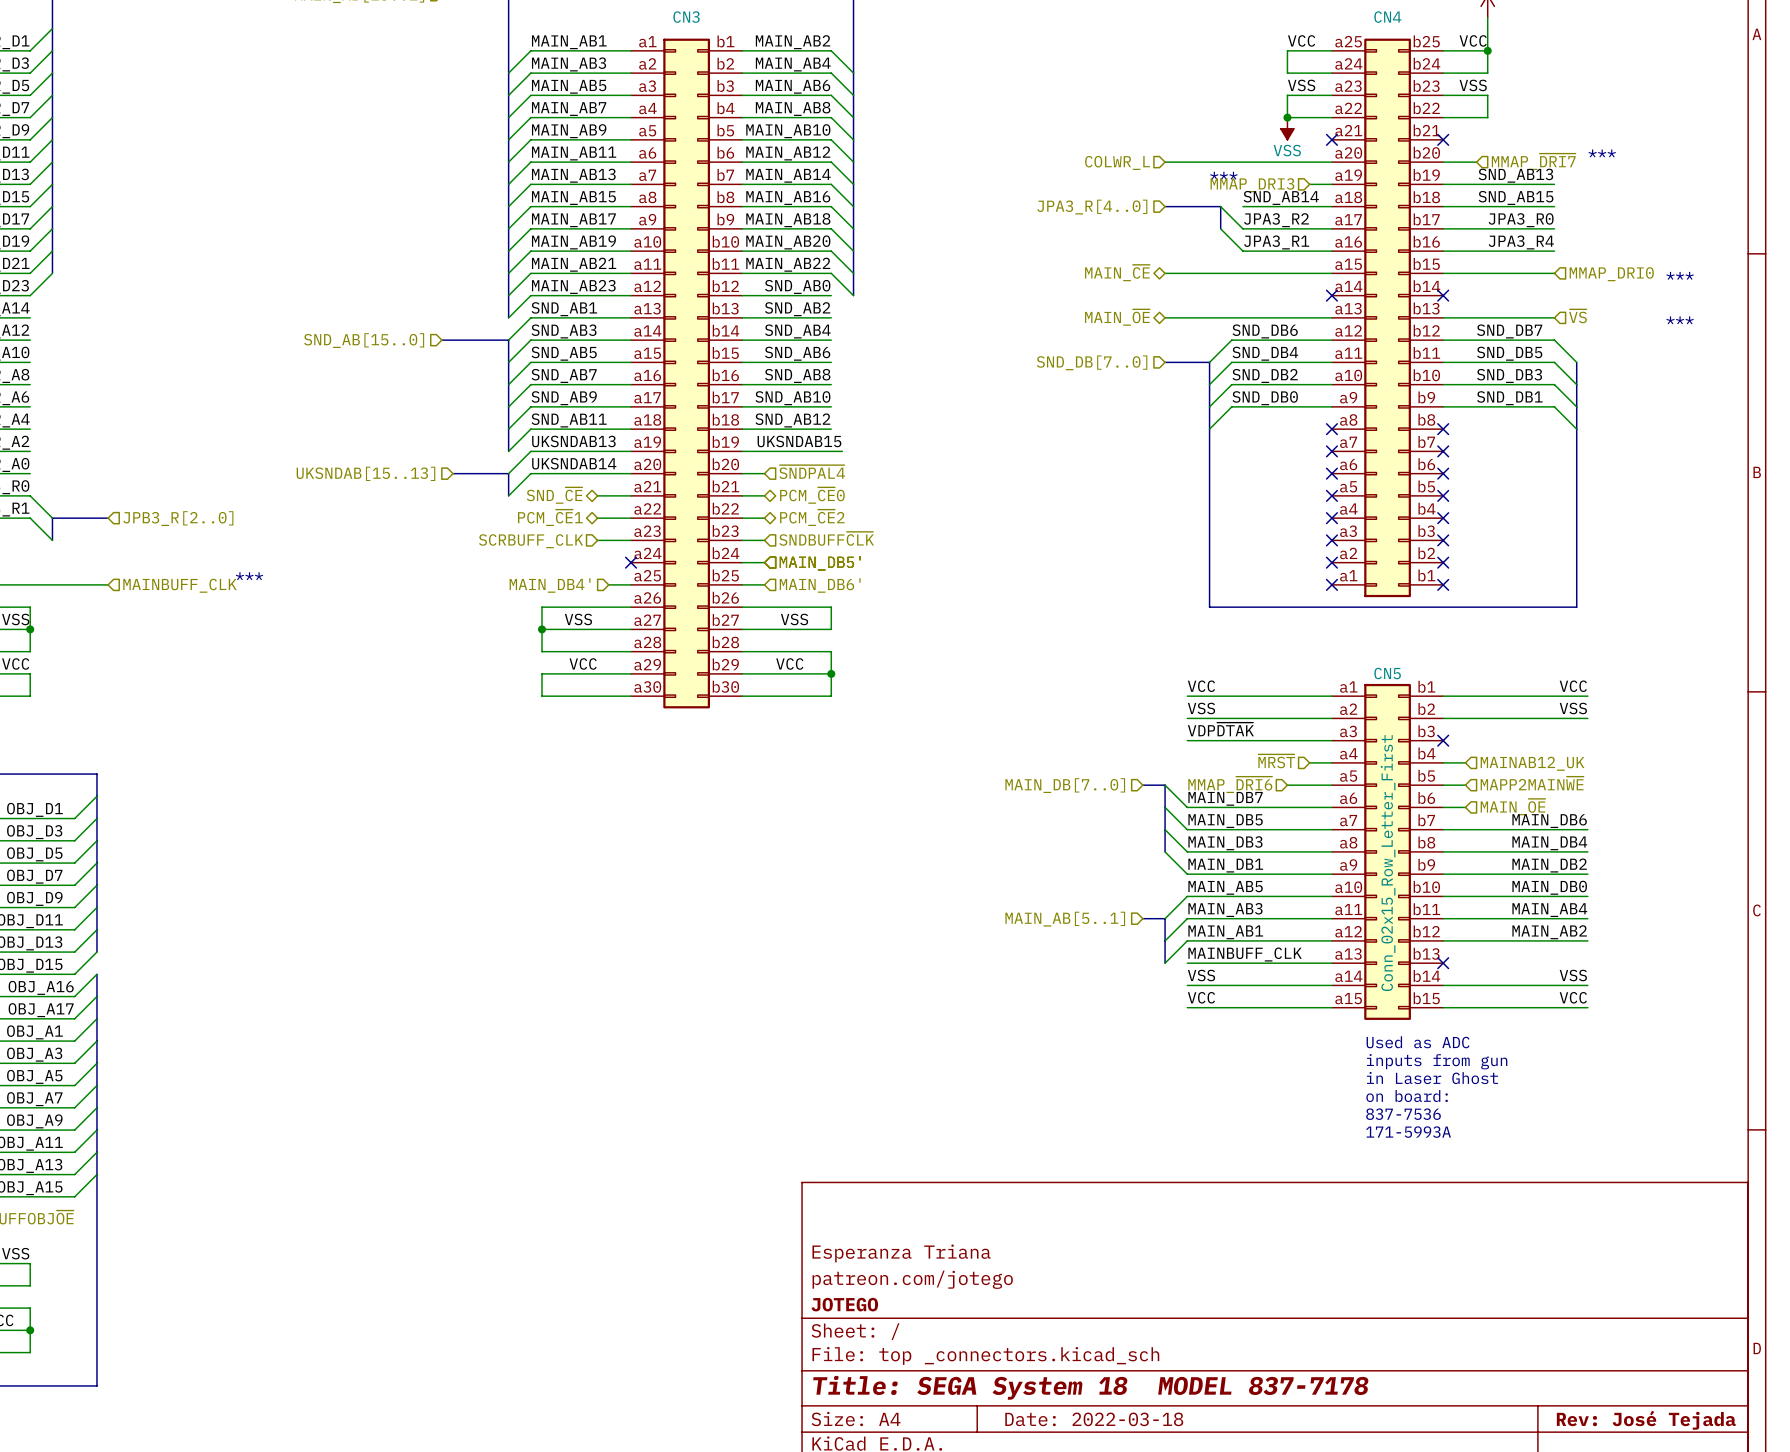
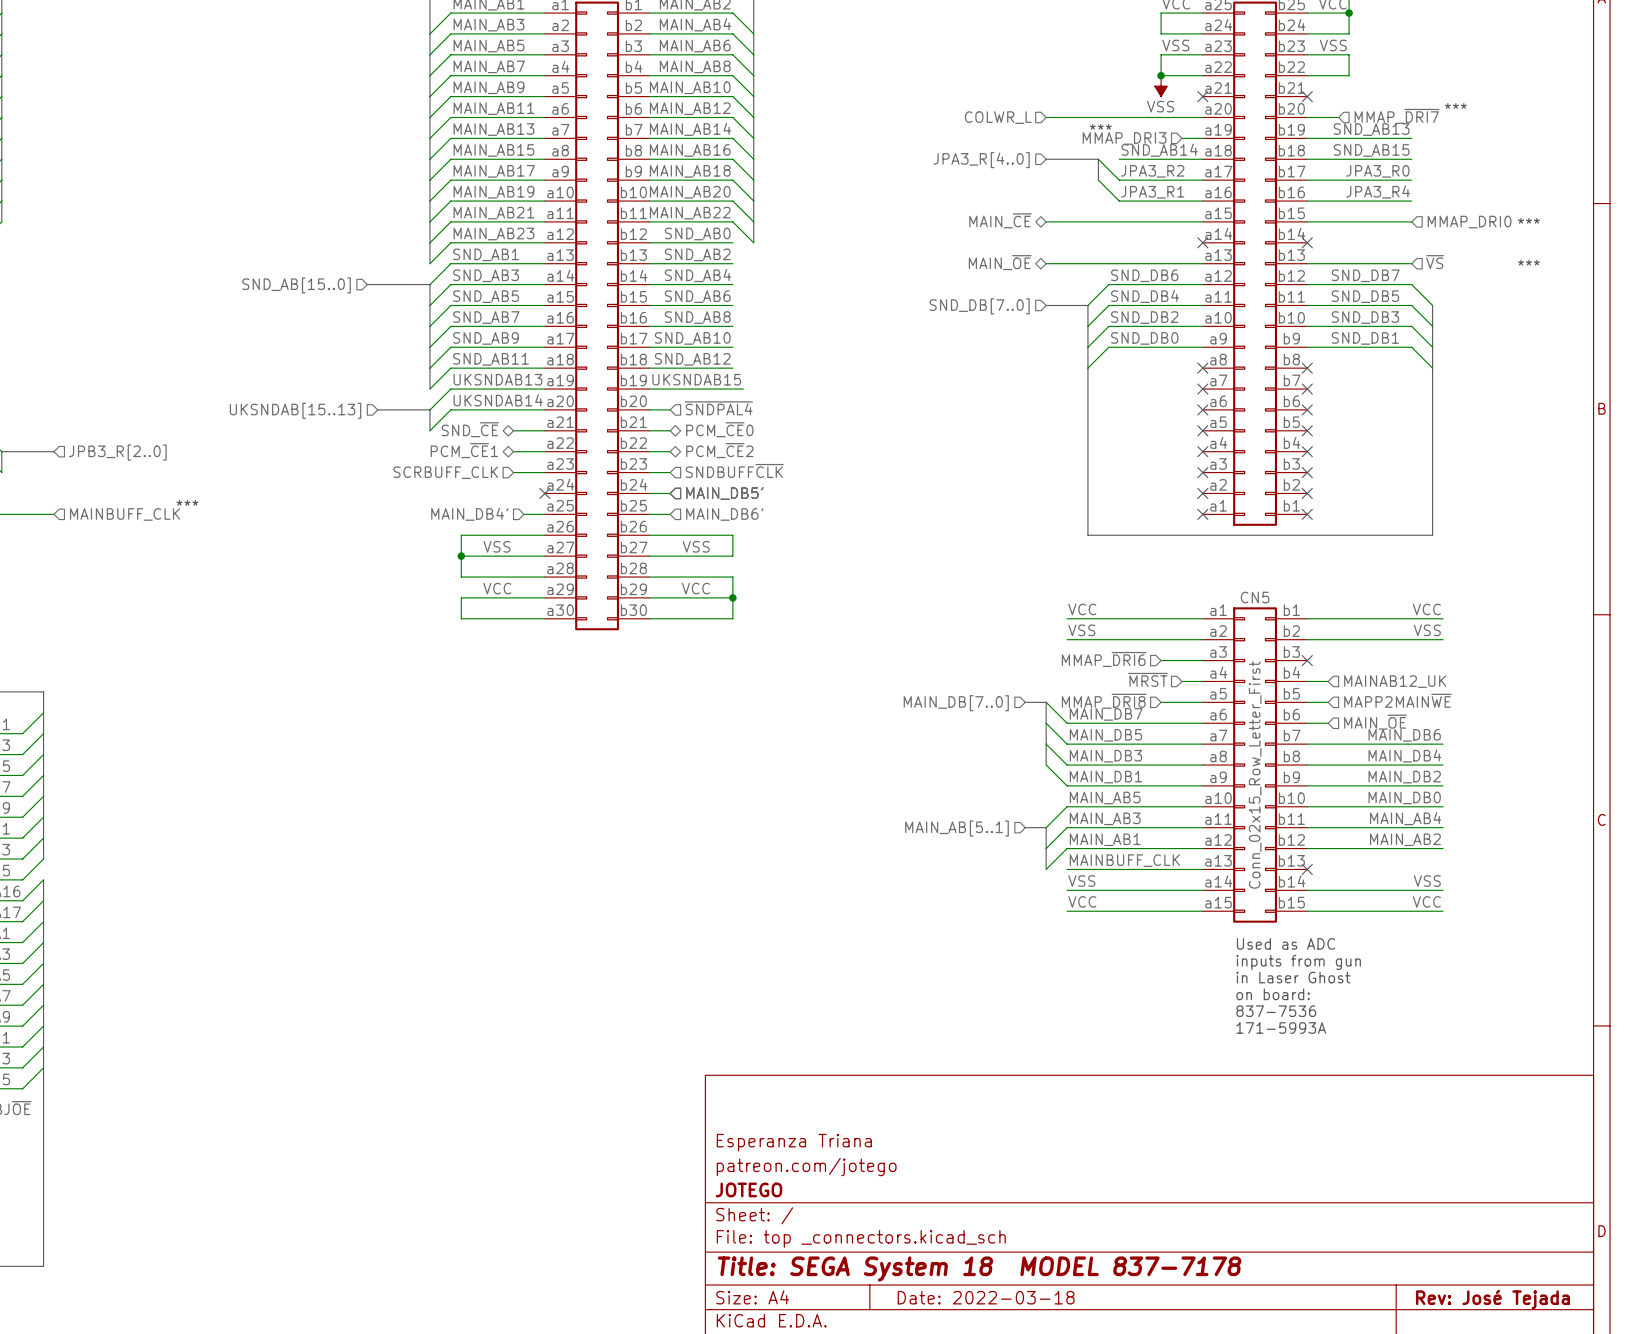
label: VDP~{DTAK} (1220, 729) -> none
wire: (1187, 740) (1287, 740) -> none
hierarchical label: none -> MMAP_~{DRI6} (1104, 659)
hierarchical label: MMAP_~{DRI6} (1230, 784) -> MMAP_~{DRI8} (1104, 701)

